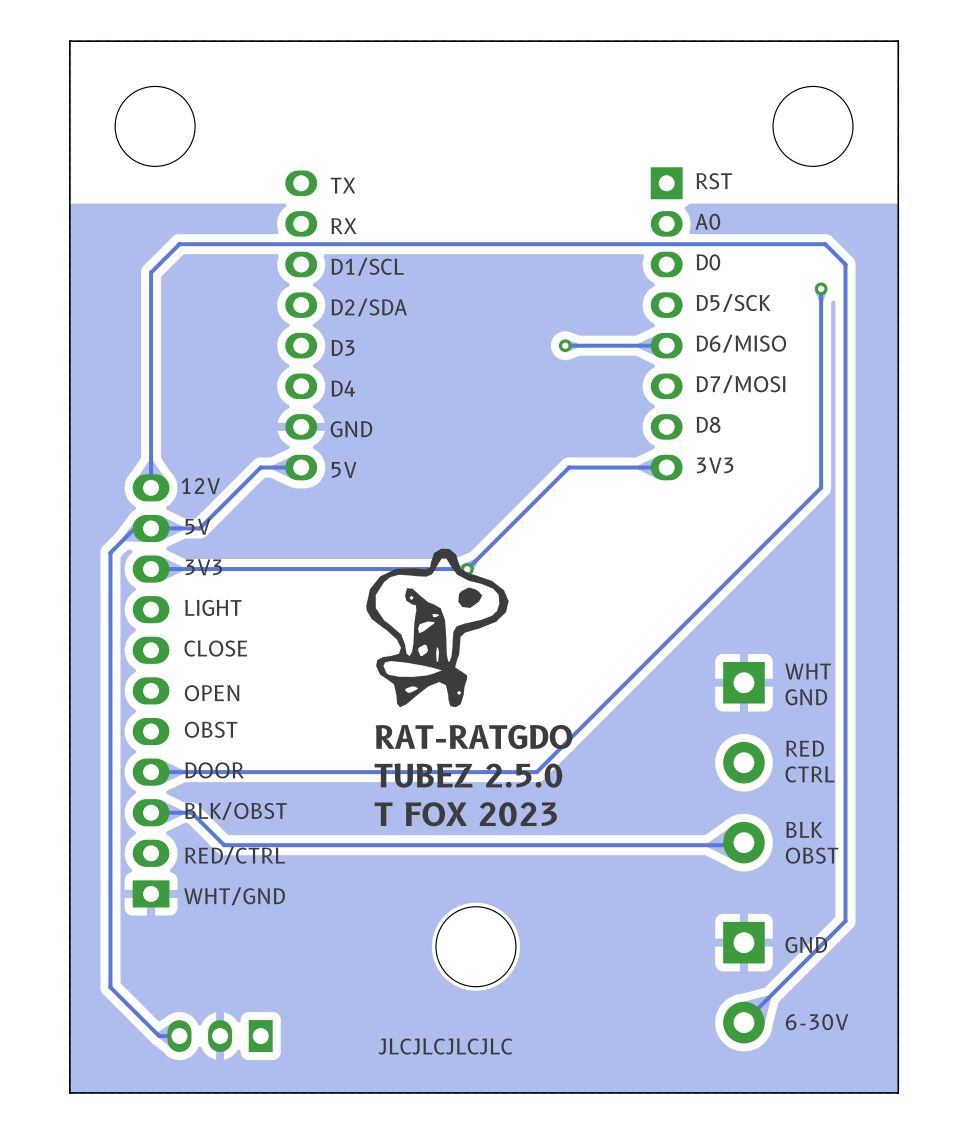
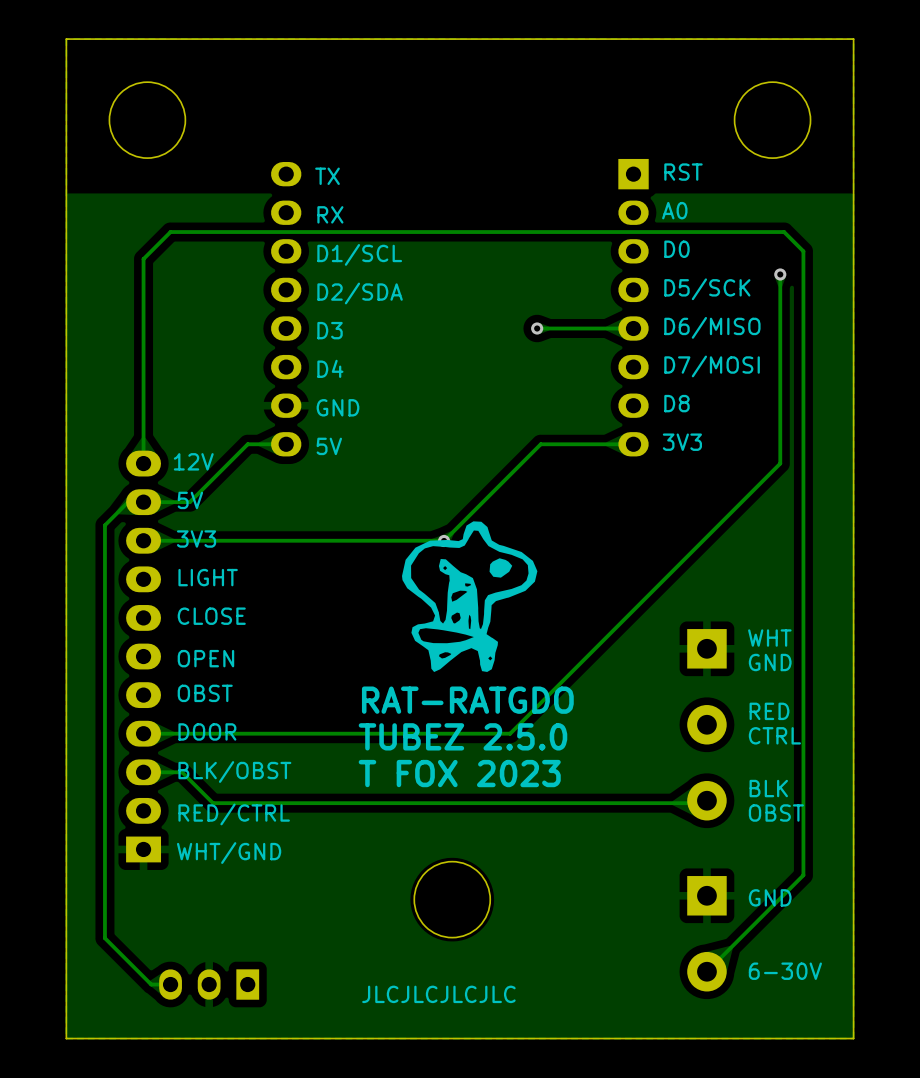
drawing position: (437, 627) -> (469, 596)

